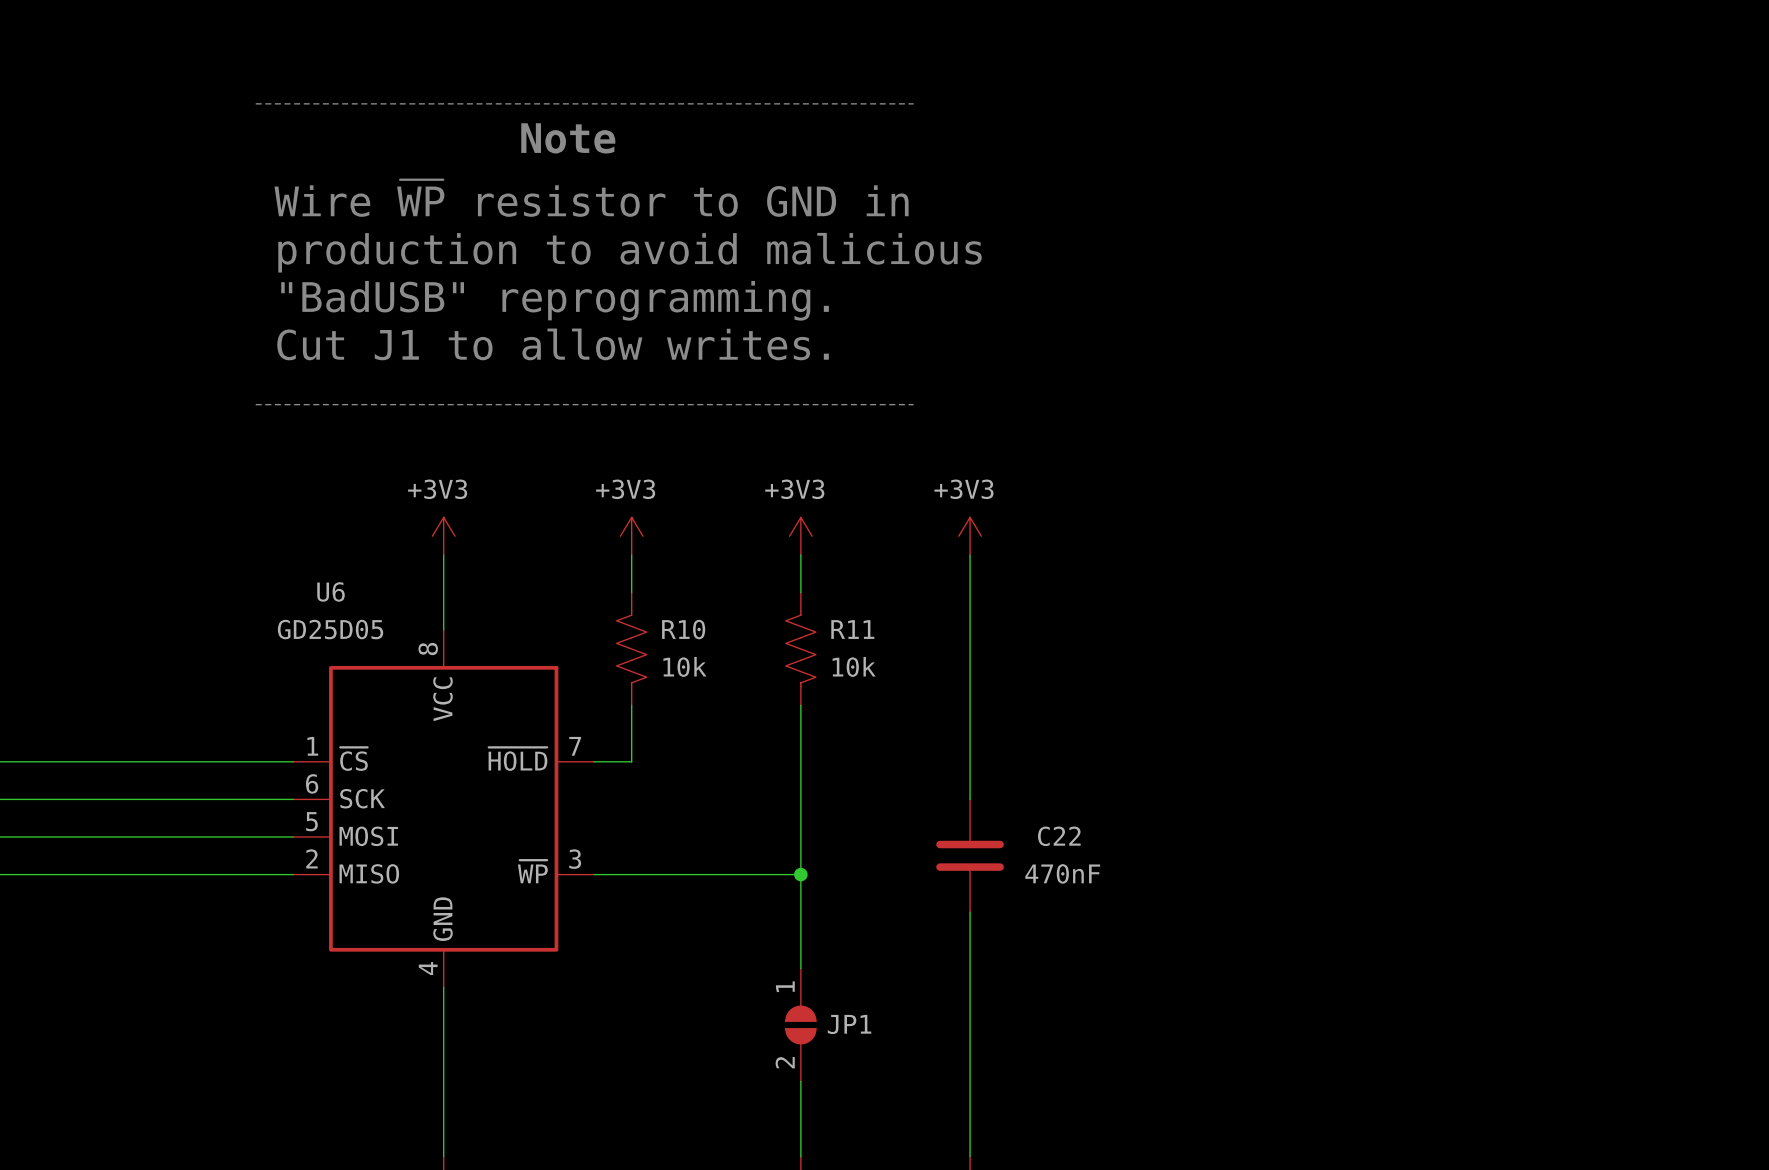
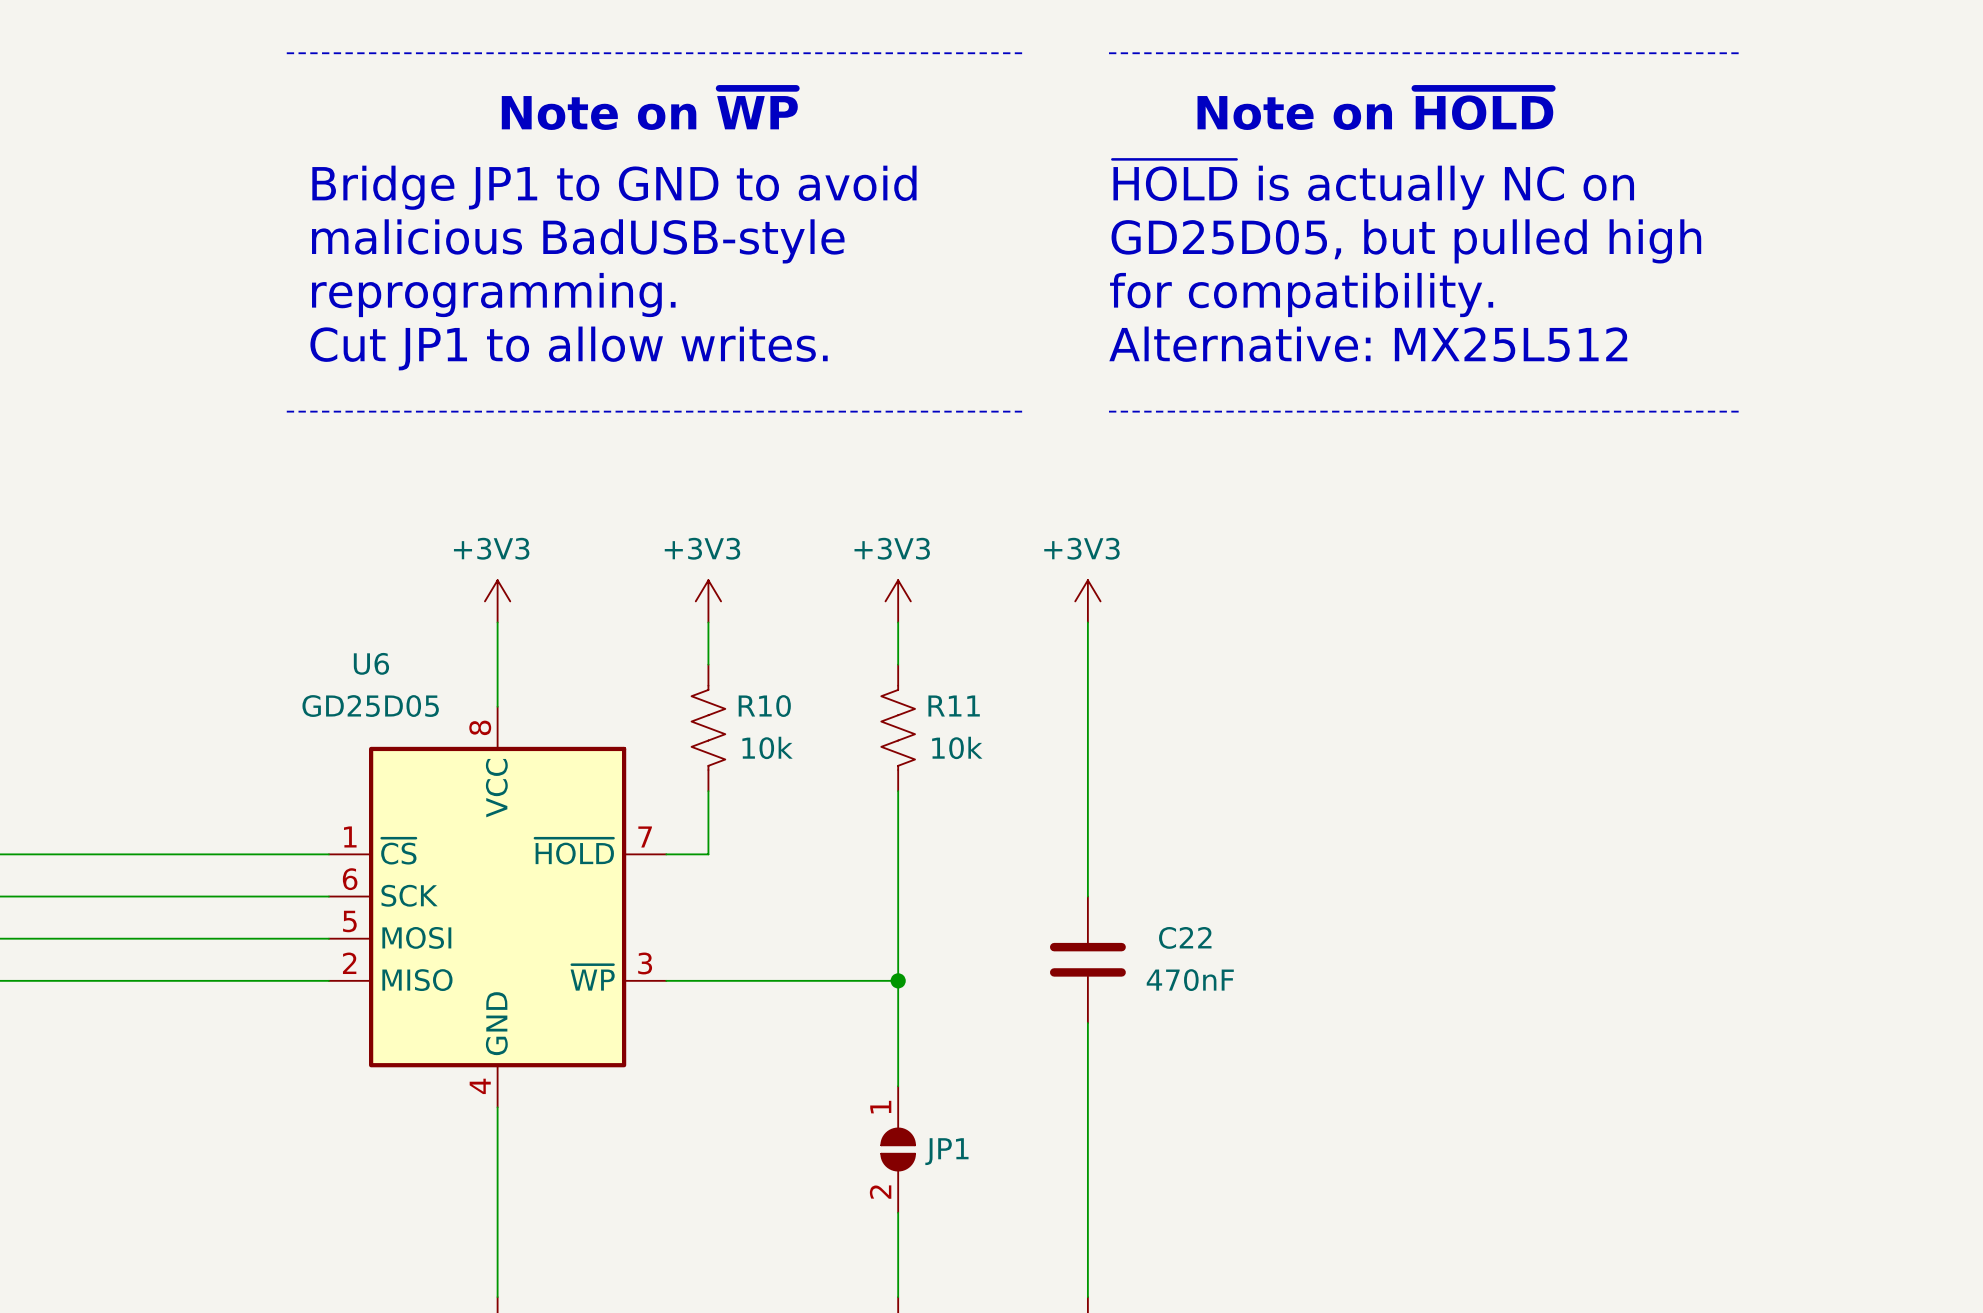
line: none -> (1108, 53) (1741, 53)
text: none -> Note on ~{WP} (649, 109)
text: none -> Note on ~{HOLD} (1375, 109)
line: (255, 103) (913, 103) -> (286, 53) (1024, 53)
text: Note (568, 138) -> none
text: none -> ~{HOLD} is actually NC on (1373, 184)
text: none -> Bridge JP1 to GND to avoid (614, 187)
text: Wire ~{WP} resistor to GND in (591, 198) -> malicious BadUSB-style (578, 241)
text: none -> GD25D05, but pulled high (1406, 241)
text: production to avoid malicious (630, 252) -> reprogramming. (493, 295)
text: none -> for compatibility. (1301, 295)
text: "BadUSB" reprogramming. (555, 300) -> Cut JP1 to allow writes. (569, 348)
text: none -> Alternative: MX25L512 (1368, 344)
text: Cut J1 to allow writes. (553, 344) -> none
line: none -> (1108, 411) (1741, 411)
line: (255, 404) (913, 404) -> (286, 411) (1024, 411)

